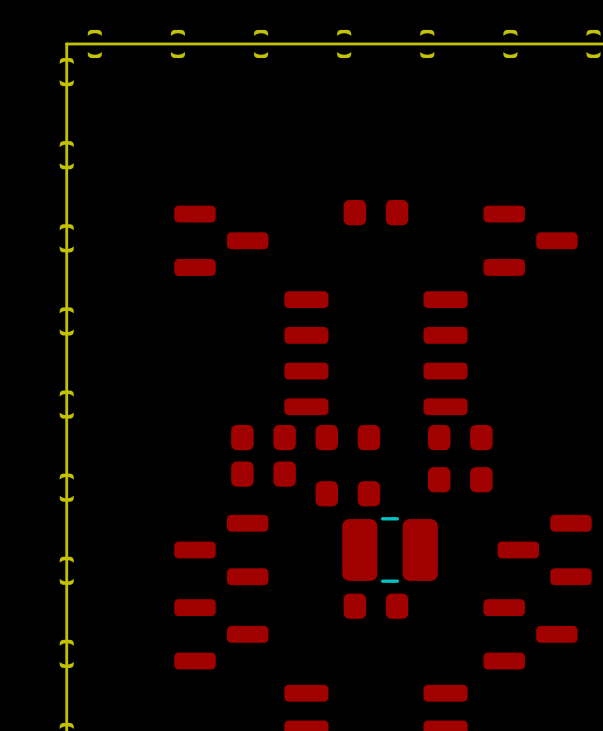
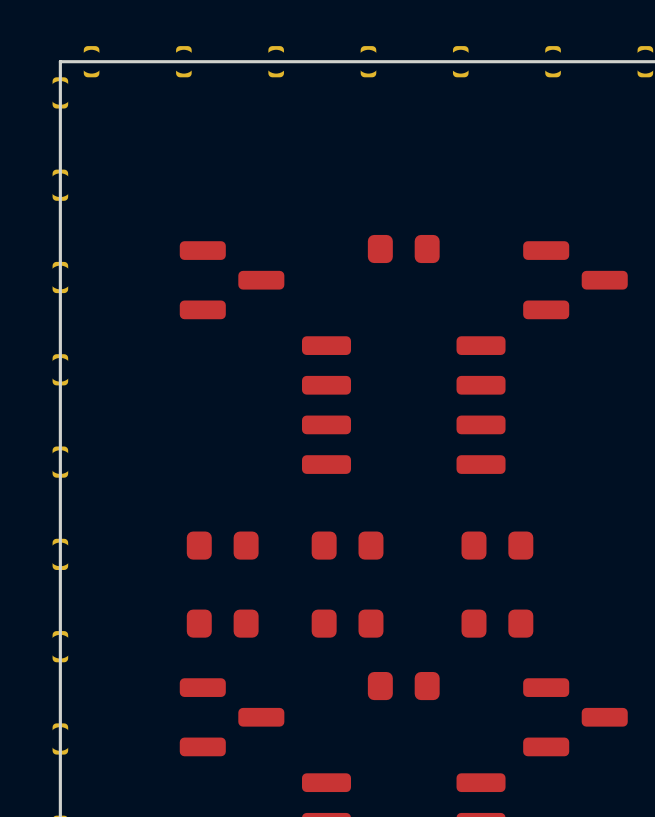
part: (263, 437) -> none
part: (347, 437) -> none
part: (460, 437) -> none
part: (263, 474) -> none
part: none -> (222, 545)
part: none -> (347, 545)
part: (347, 493) -> none
part footprint: [174, 514, 269, 586] -> [186, 609, 259, 638]
part: none -> (347, 623)
part: (390, 550) -> none
part: none -> (497, 623)
part: (544, 550) -> none

